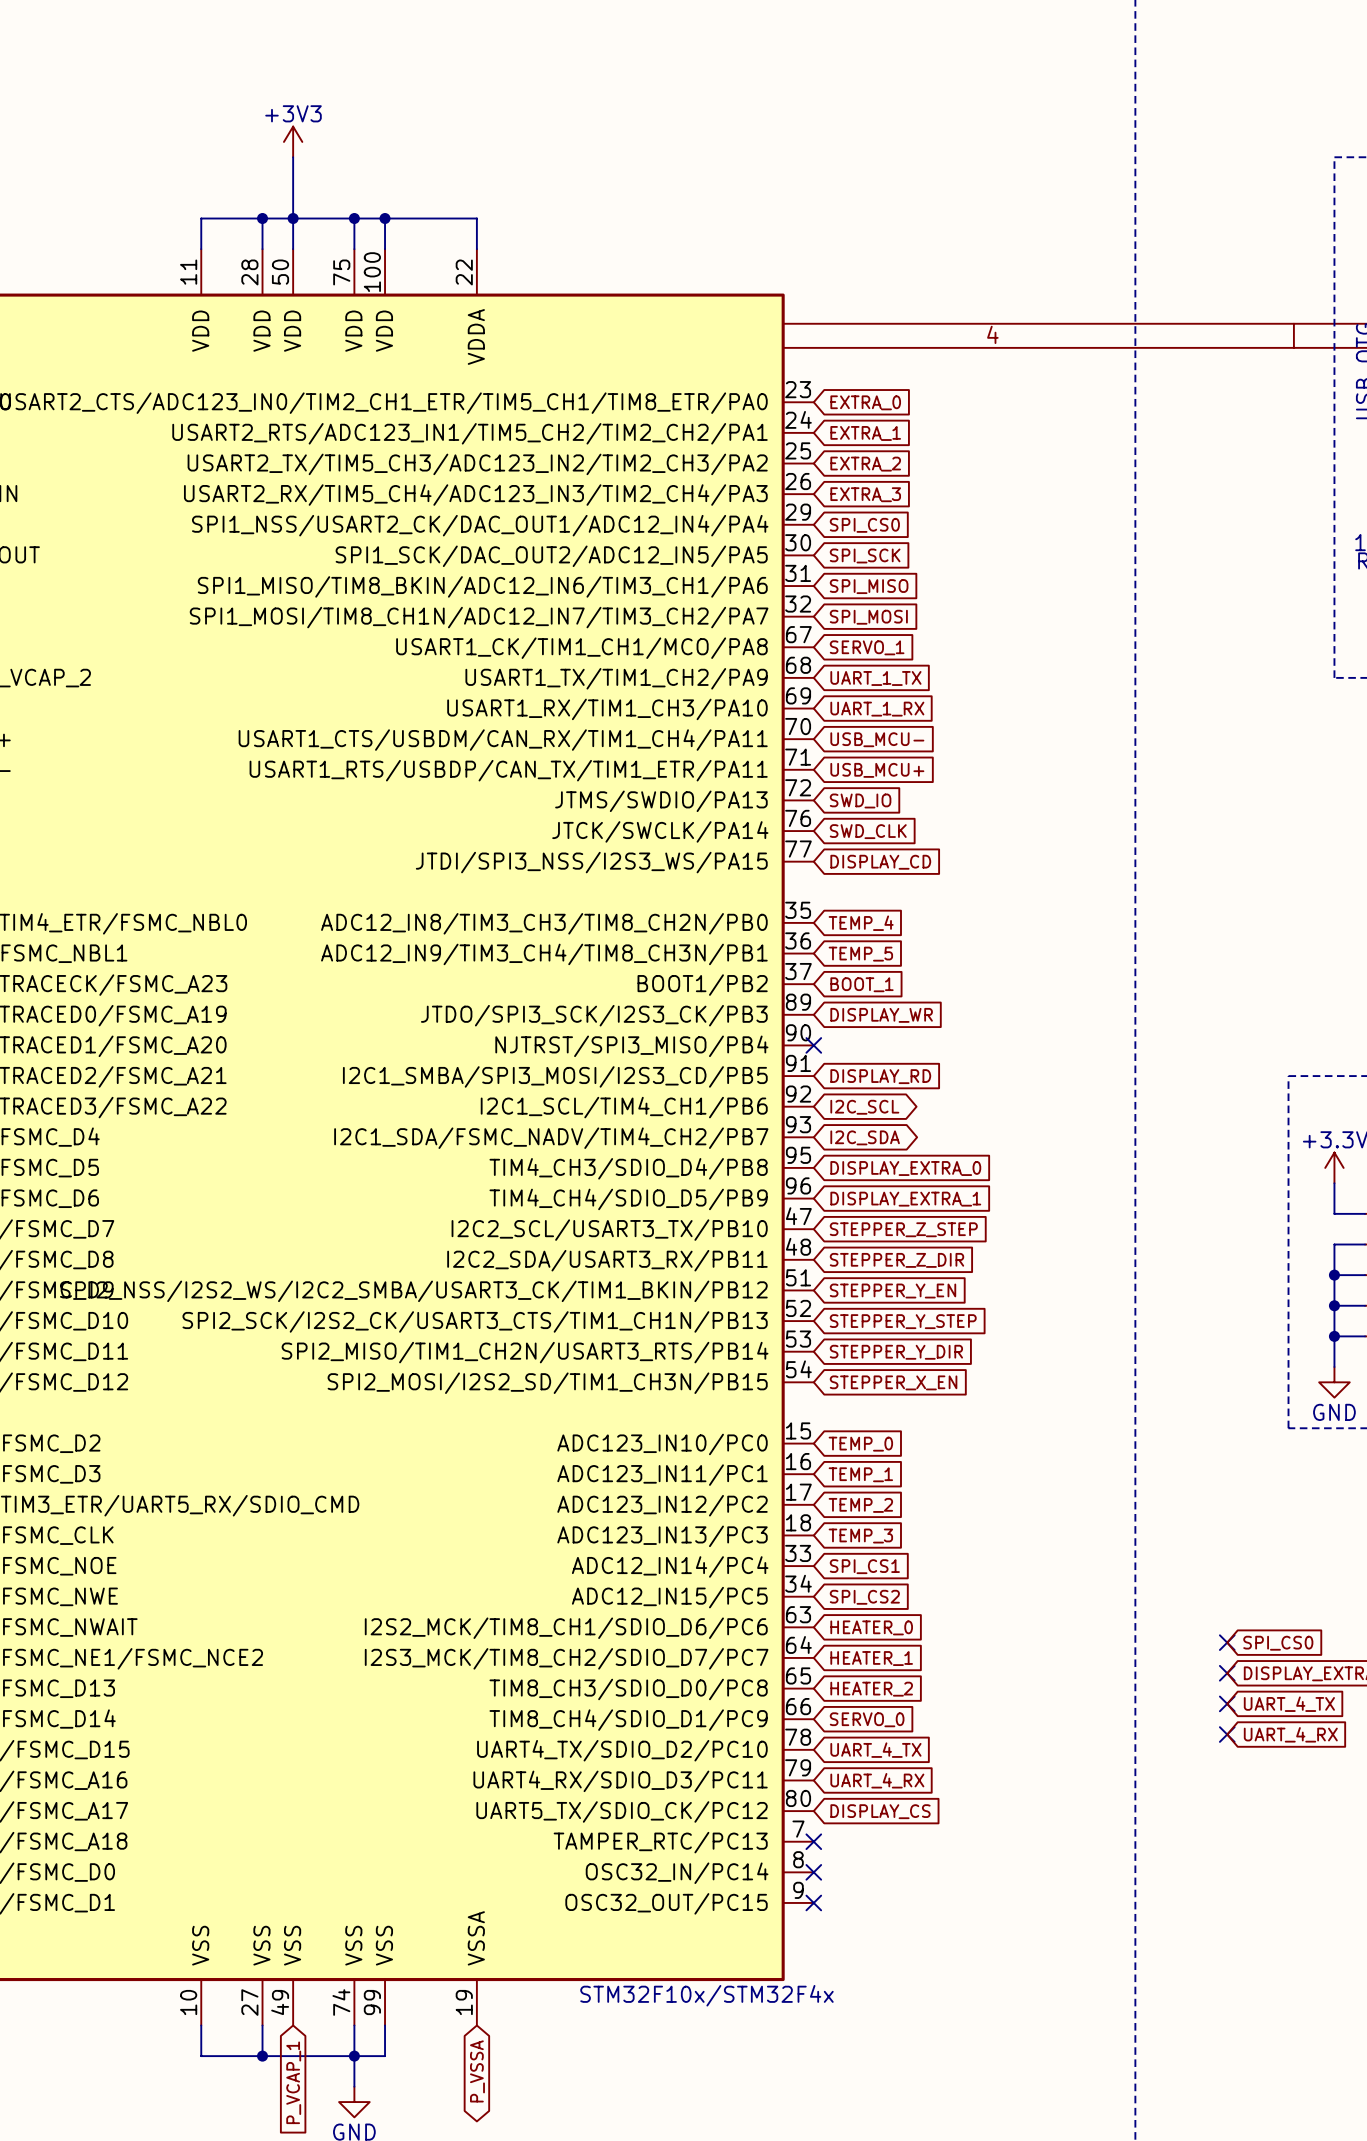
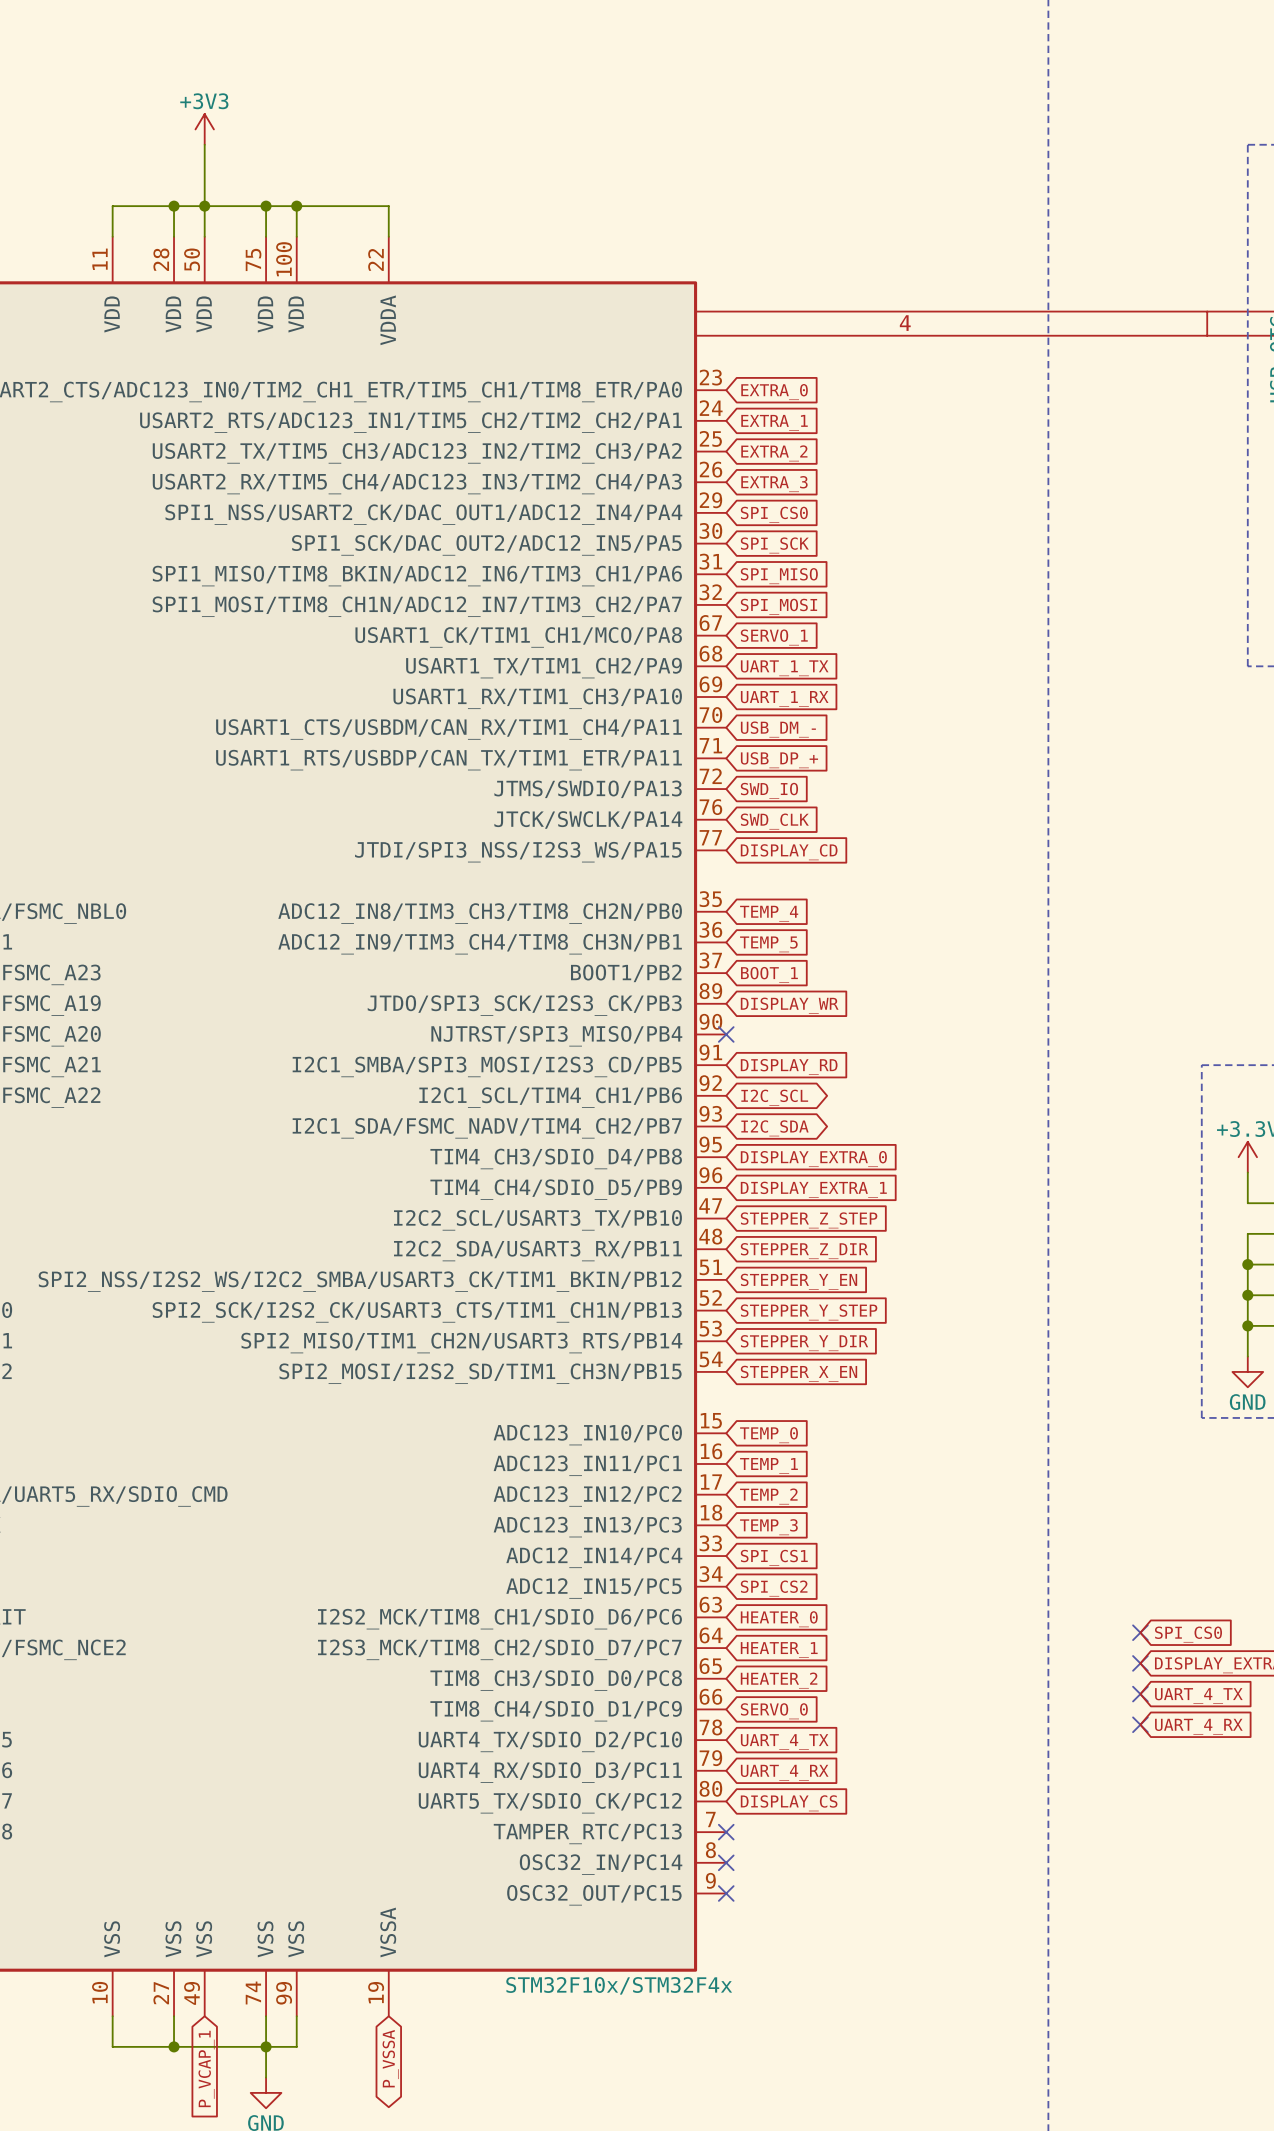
global label: USB_MCU- (877, 739) -> USB_DM_- (778, 729)
global label: USB_MCU+ (877, 770) -> USB_DP_+ (779, 760)

